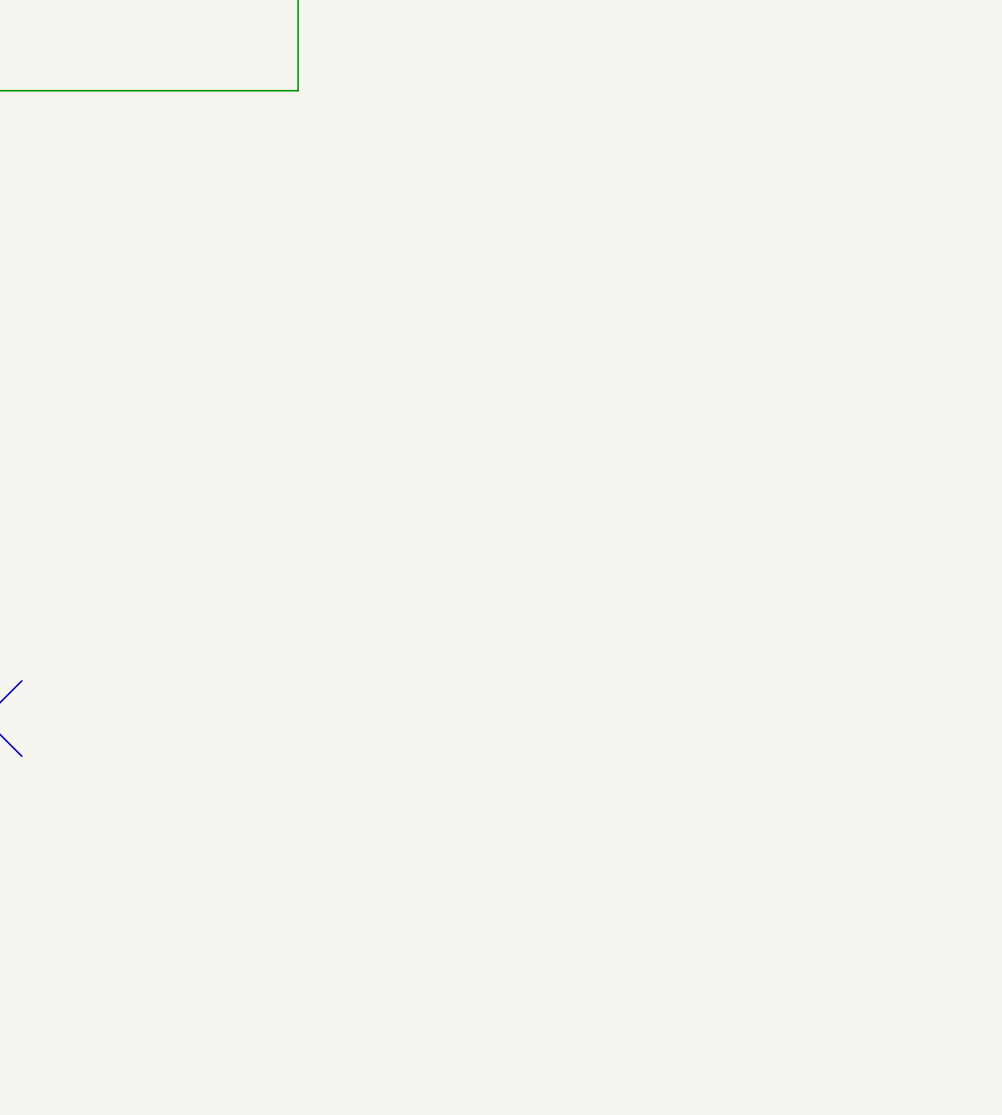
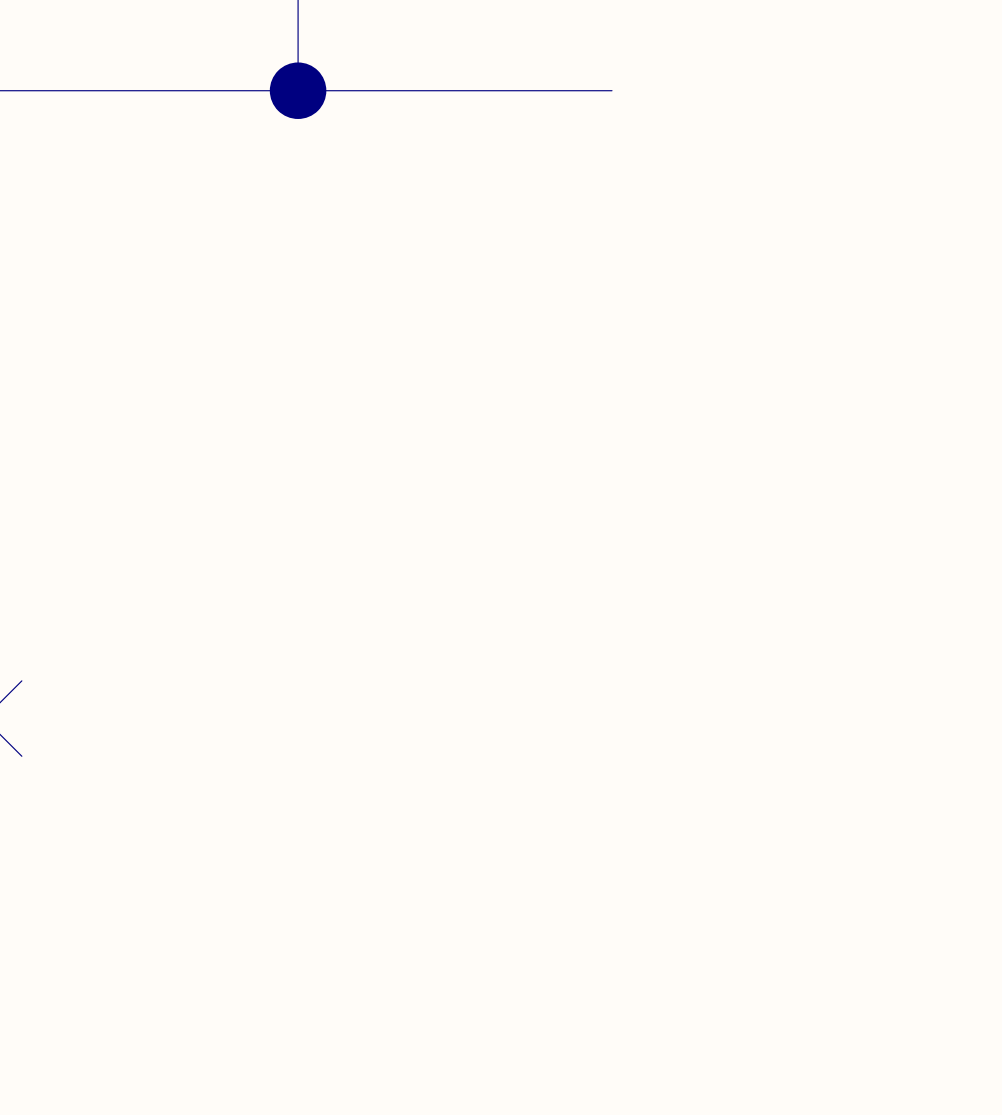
wire: none -> (298, 90) (612, 90)
junction: none -> (298, 90)

